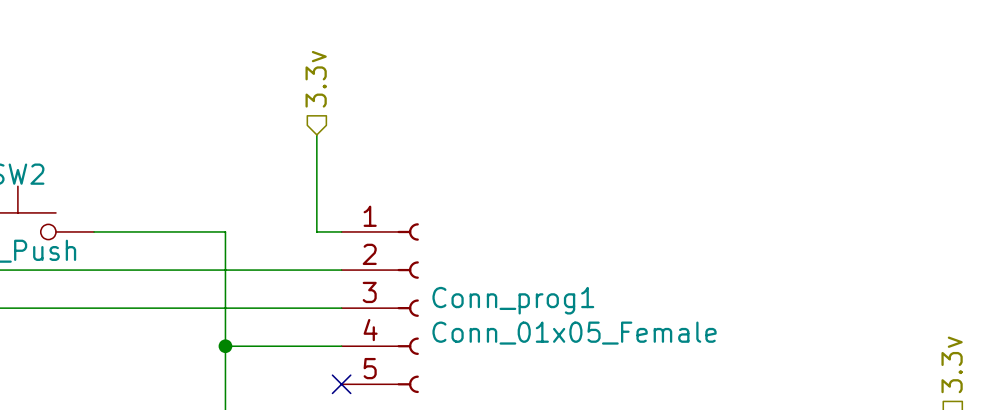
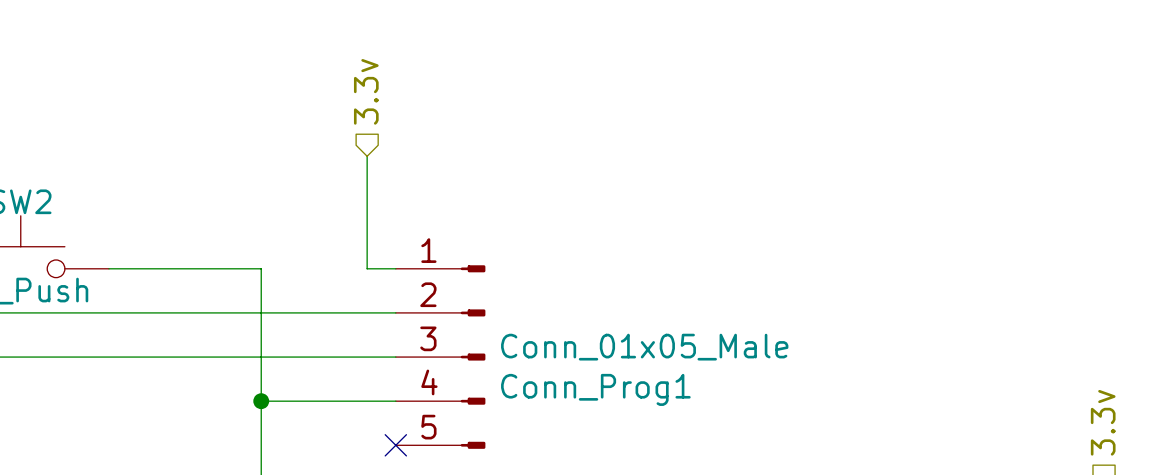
Conn_prog1: Conn_01x05_Female (380, 308) -> none
Conn_Prog1: none -> Conn_01x05_Male (440, 357)

